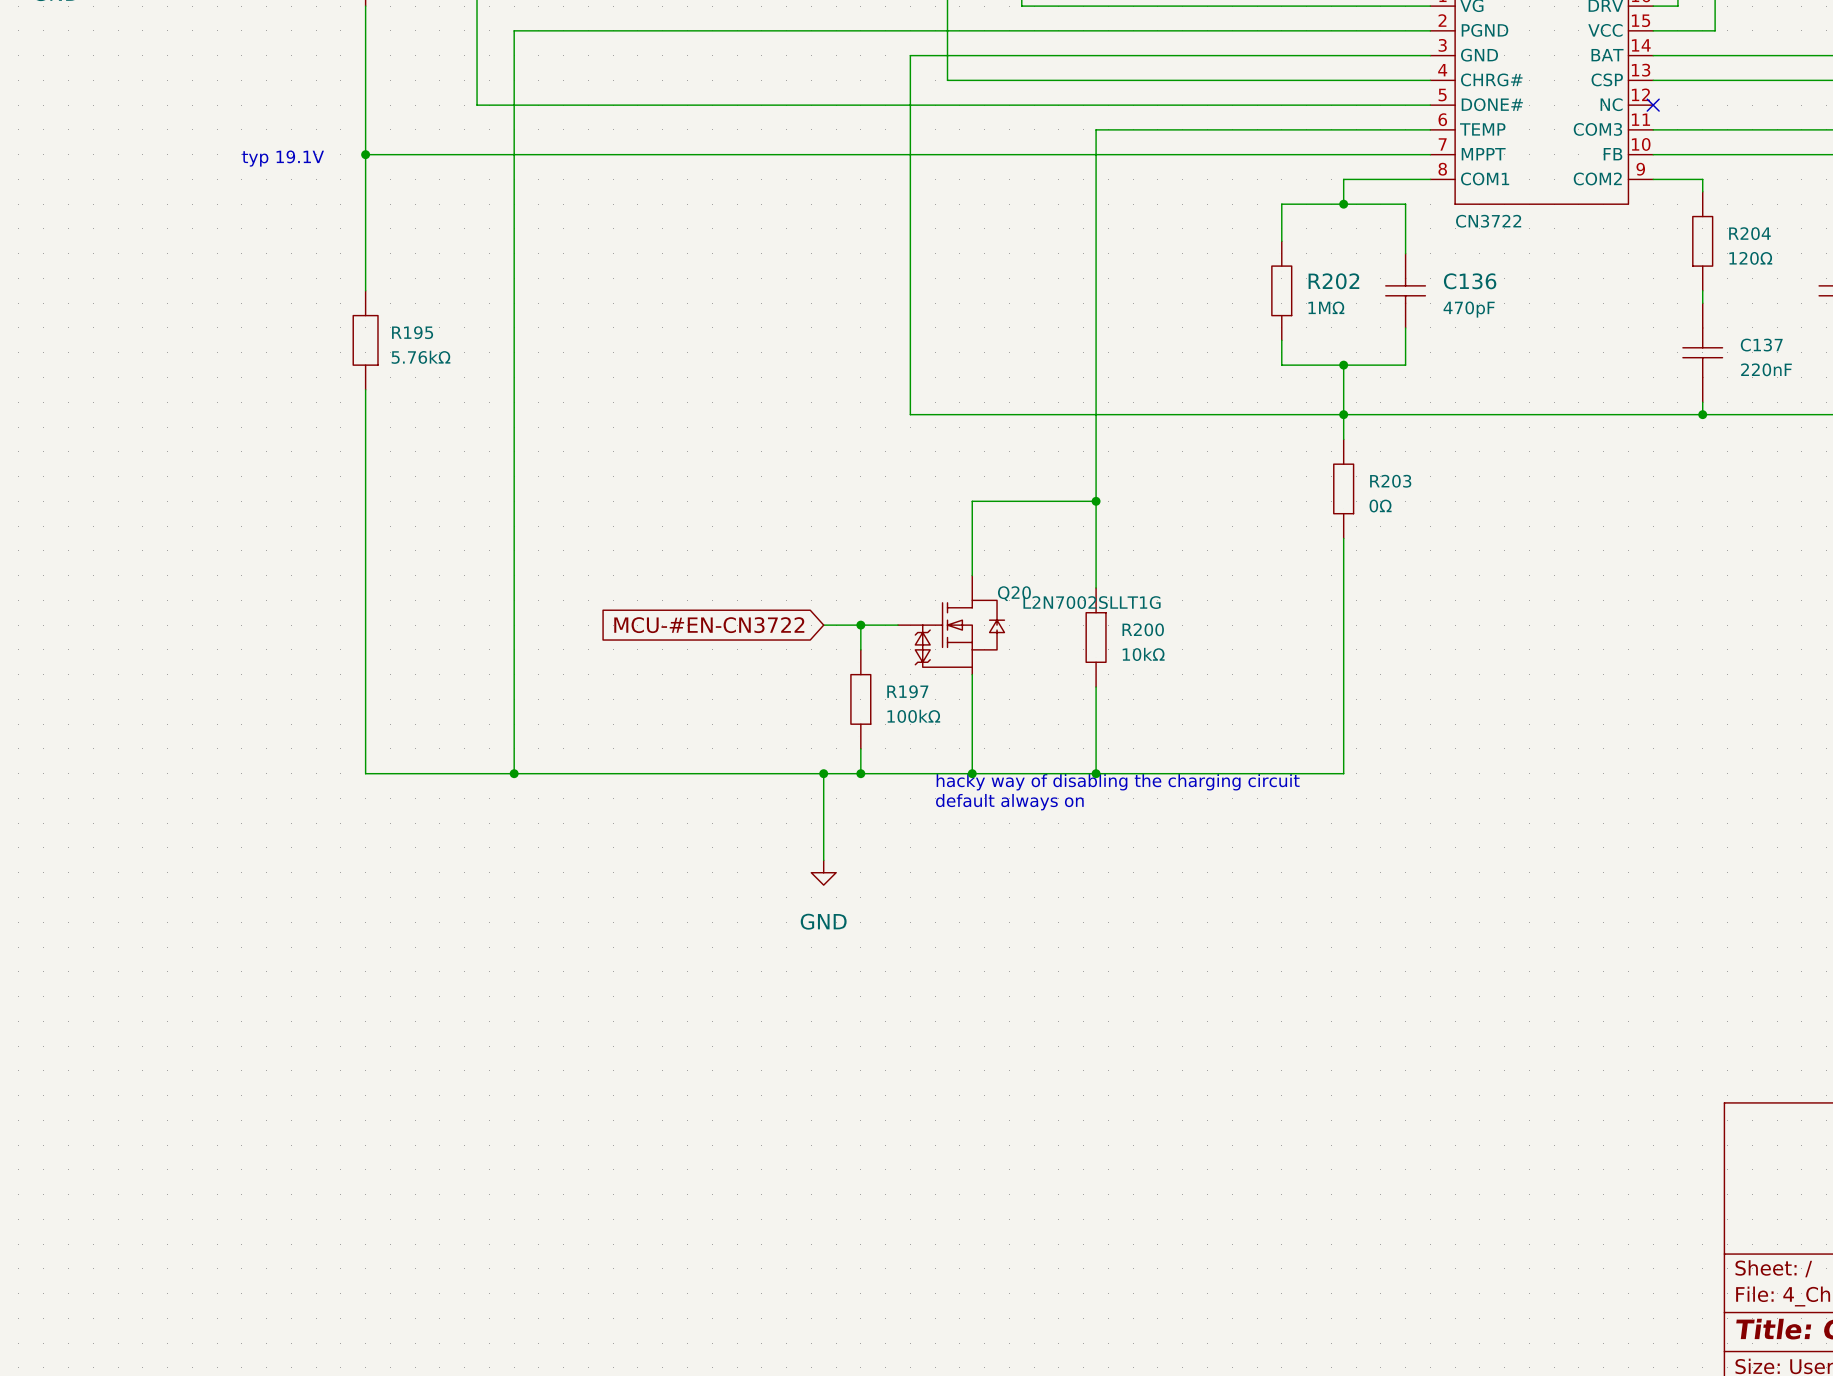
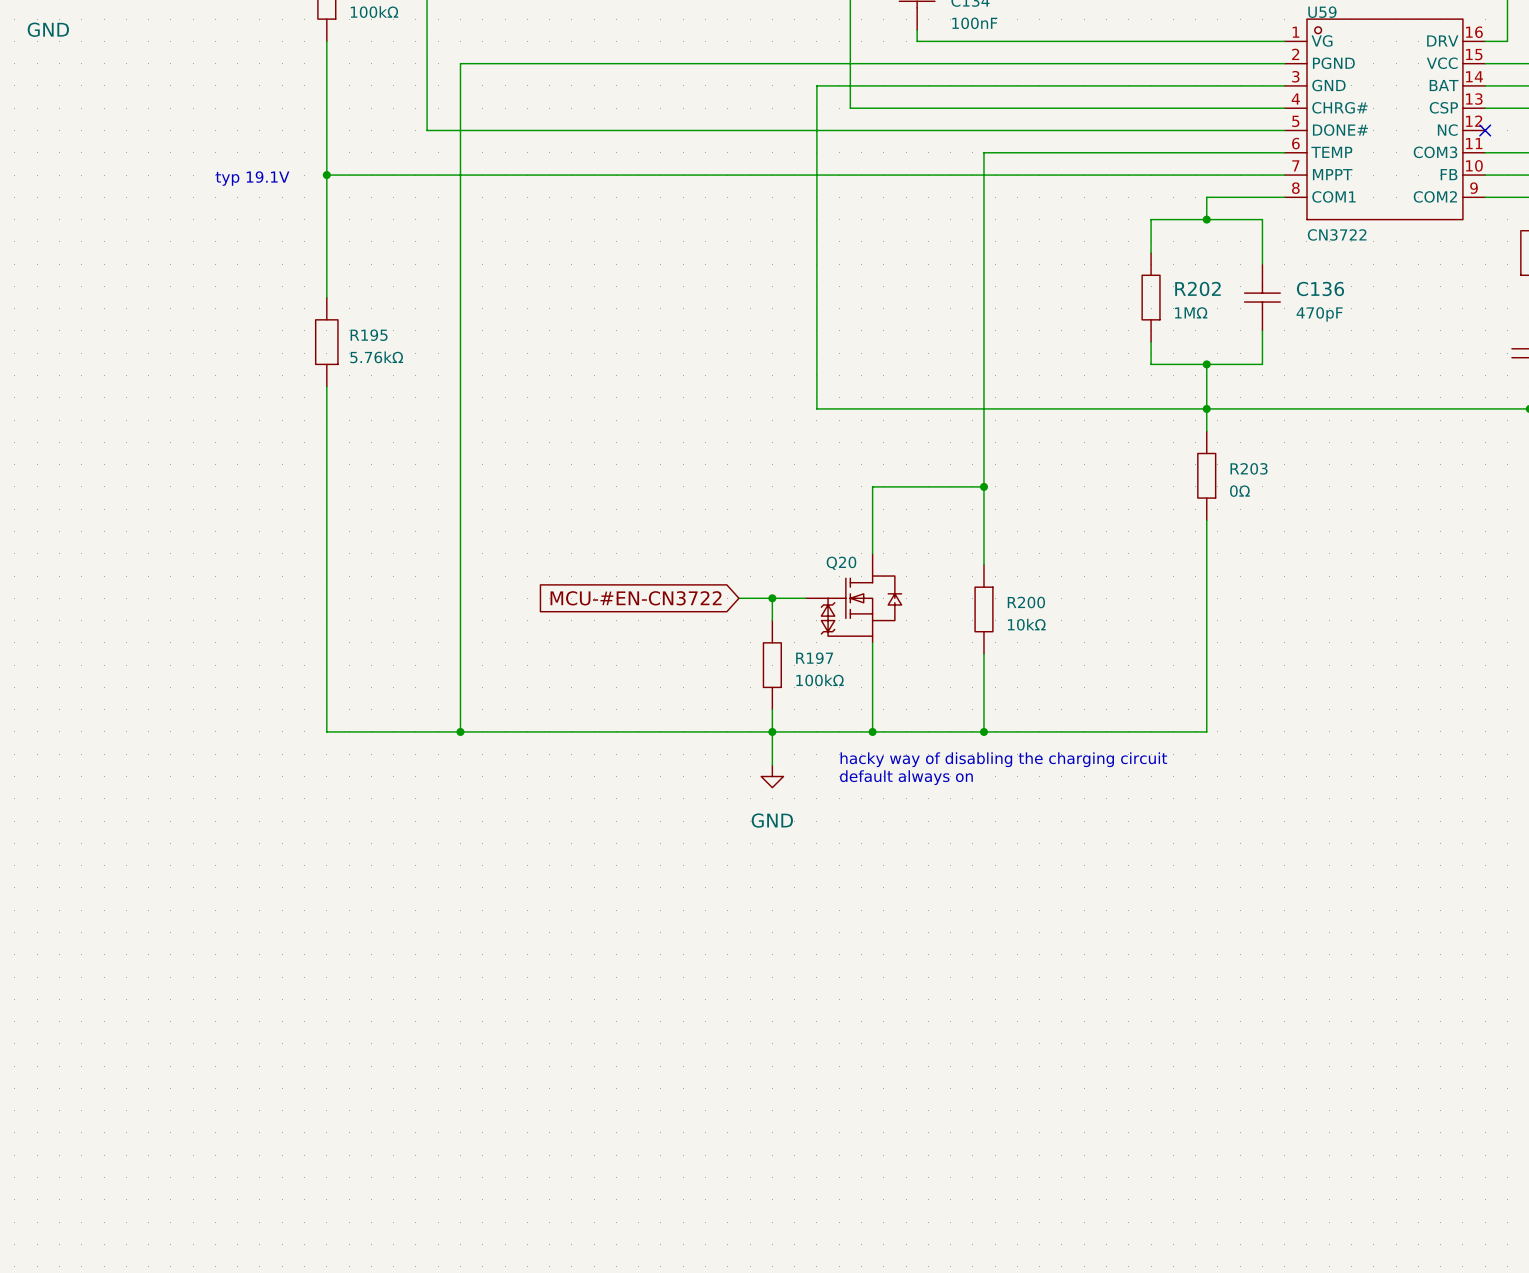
Q20 name position: Q20 (1014, 593) -> Q20 (841, 563)
Q20 value: L2N7002SLLT1G (1092, 602) -> none
wire: (823, 773) (823, 860) -> none
junction: (823, 773) -> none
wire: none -> (772, 731) (772, 765)
text: hacky way of disabling the charging circuit (1118, 782) -> none
text: default always on (1009, 802) -> hacky way of disabling the charging circuit (1003, 759)
text: none -> default always on (906, 777)
power symbol position: GND (823, 872) -> GND (772, 776)

